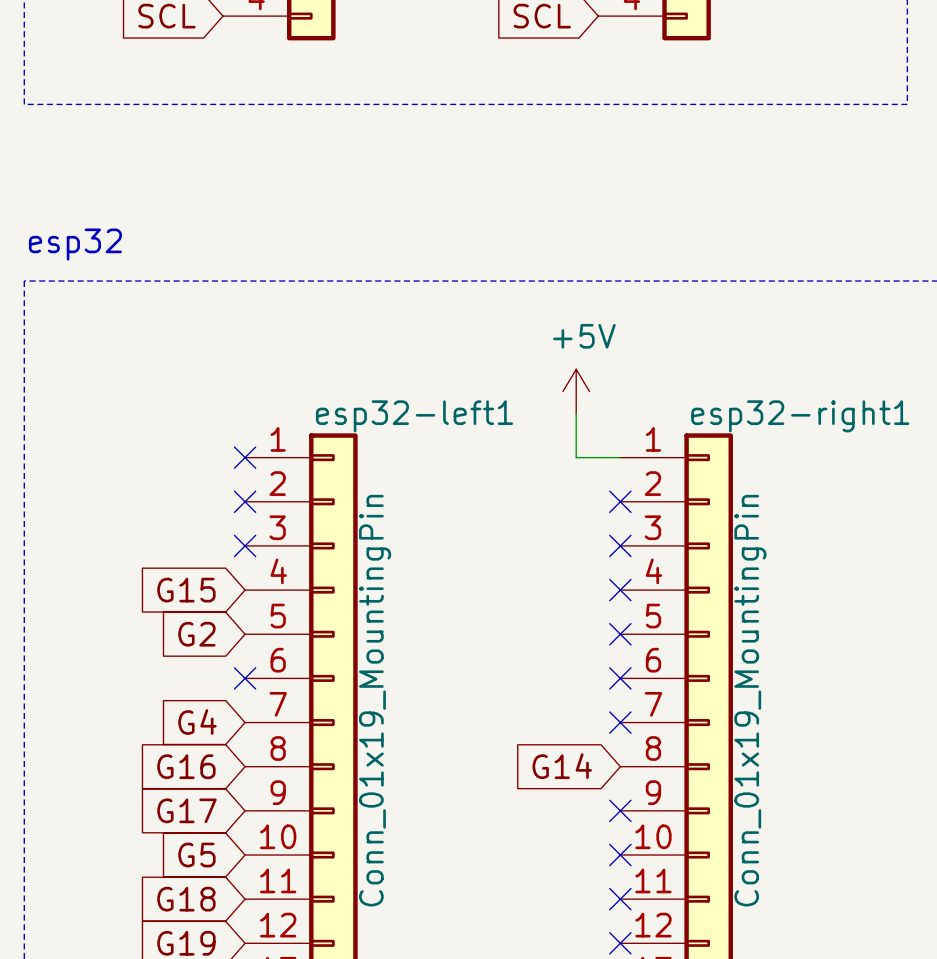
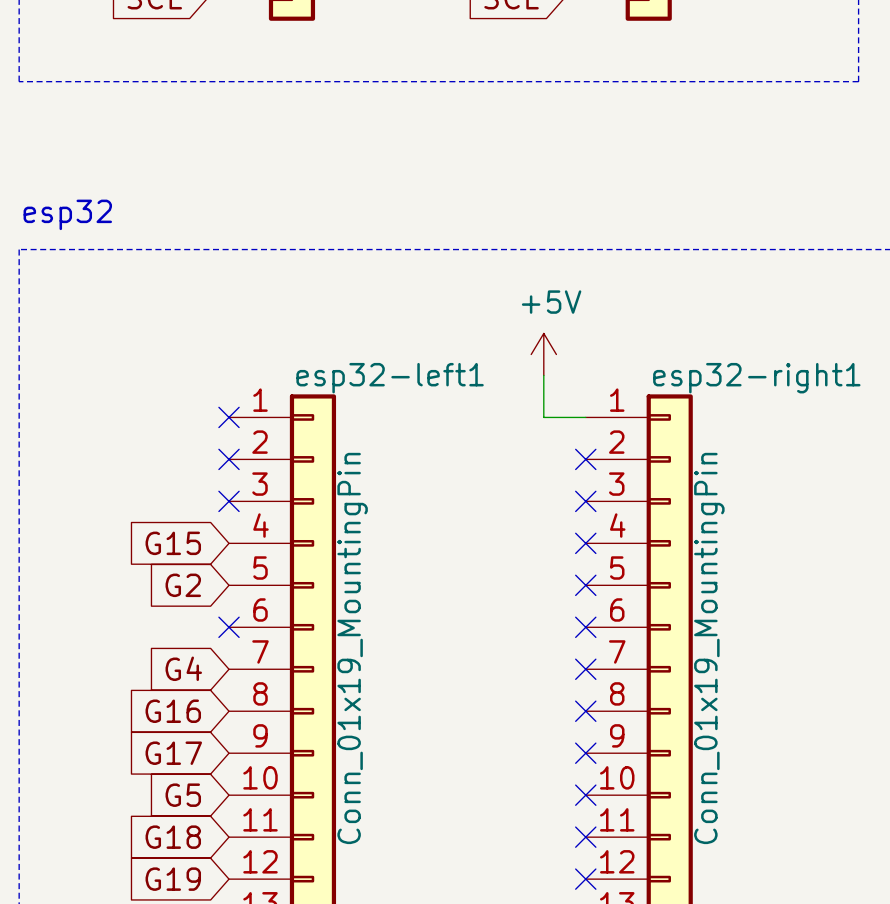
global label: G14 (562, 766) -> none
no-connect mark: none -> (585, 711)

